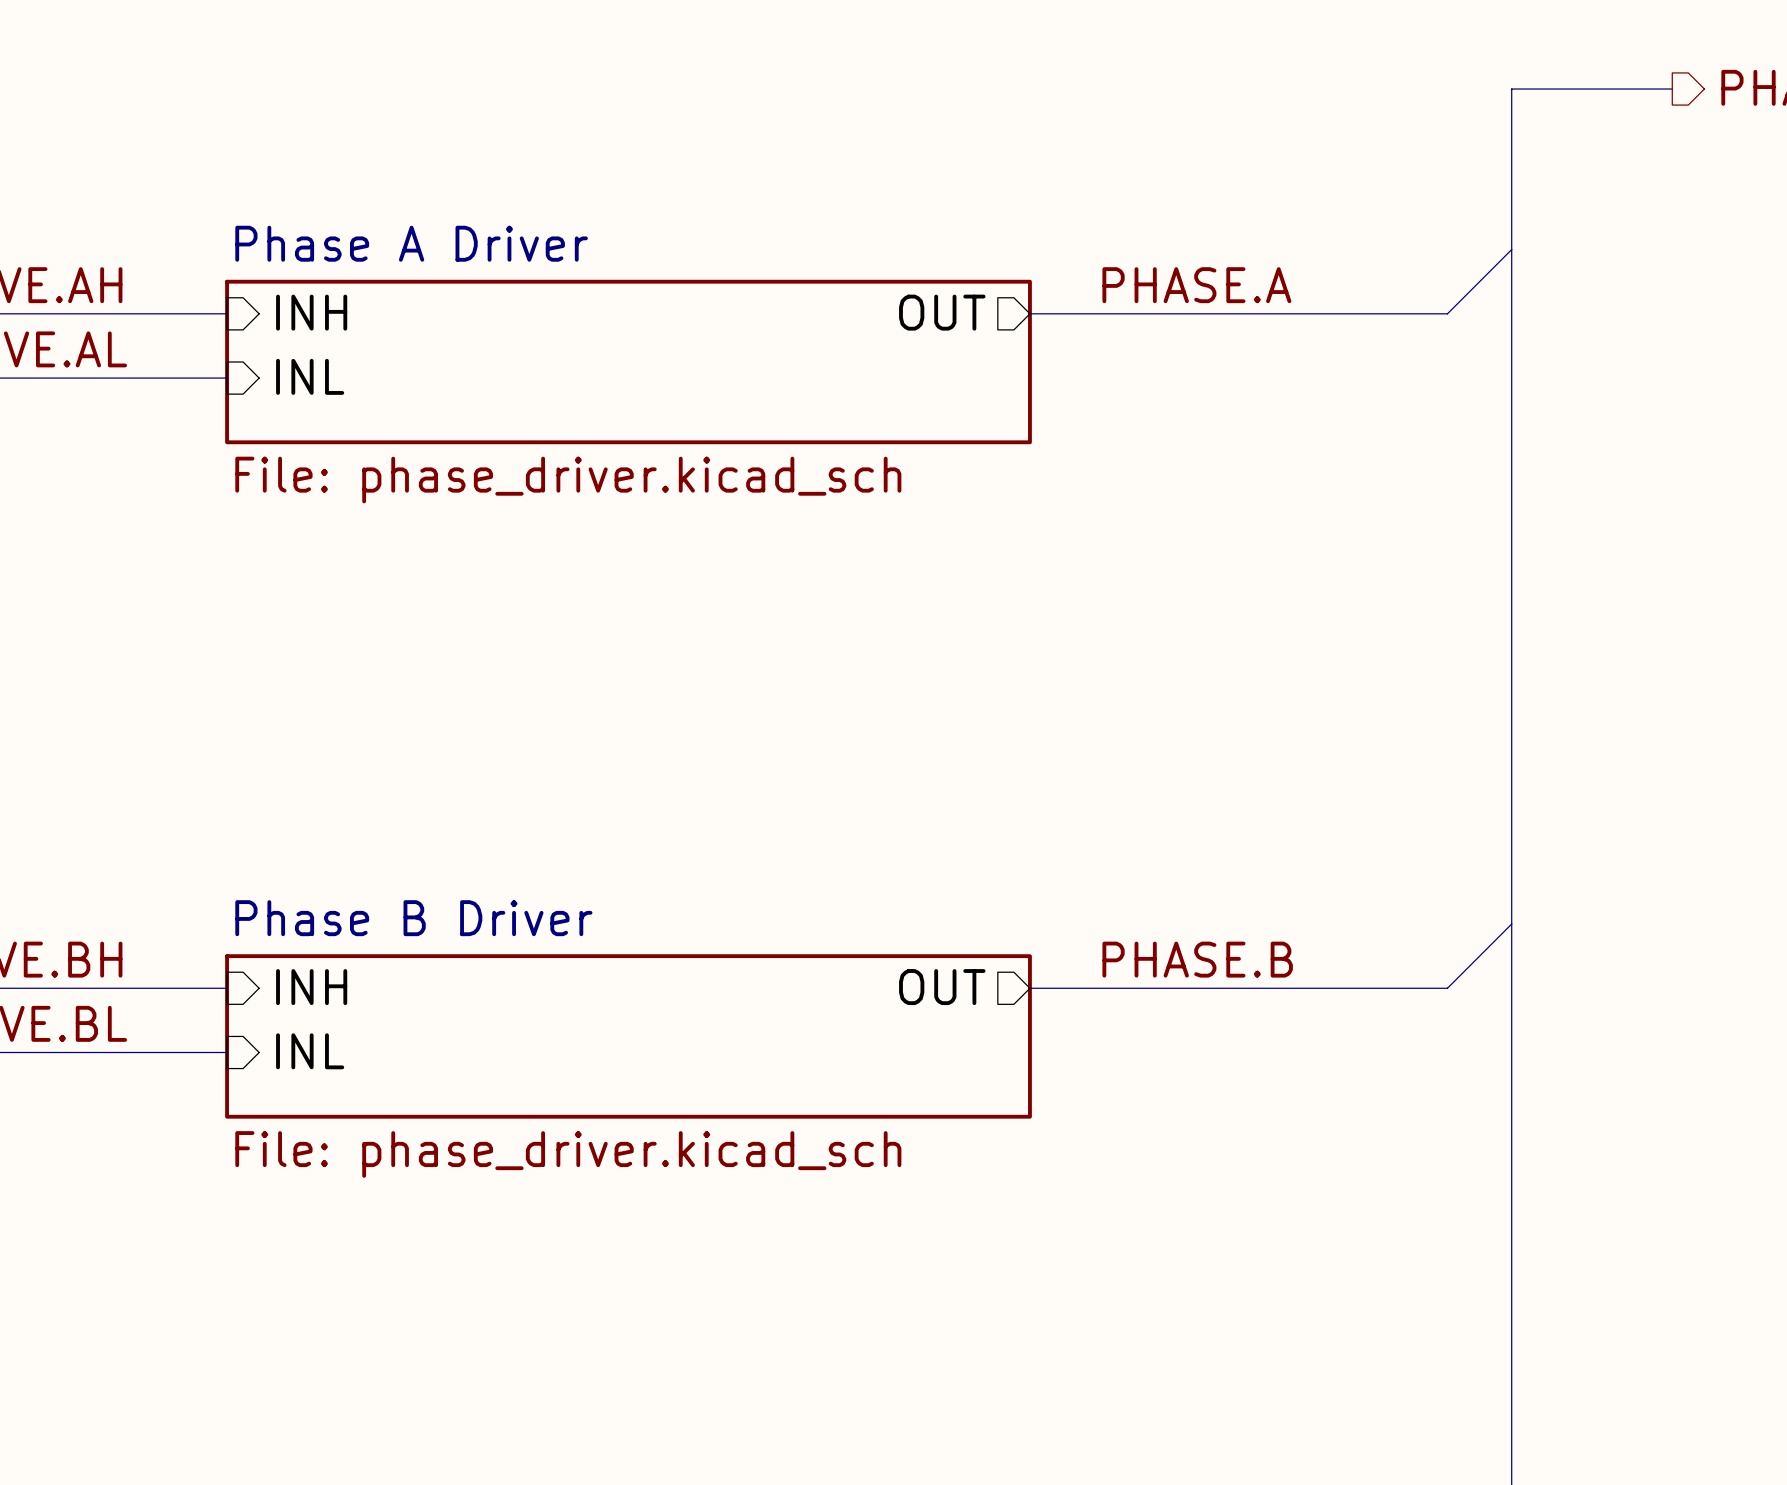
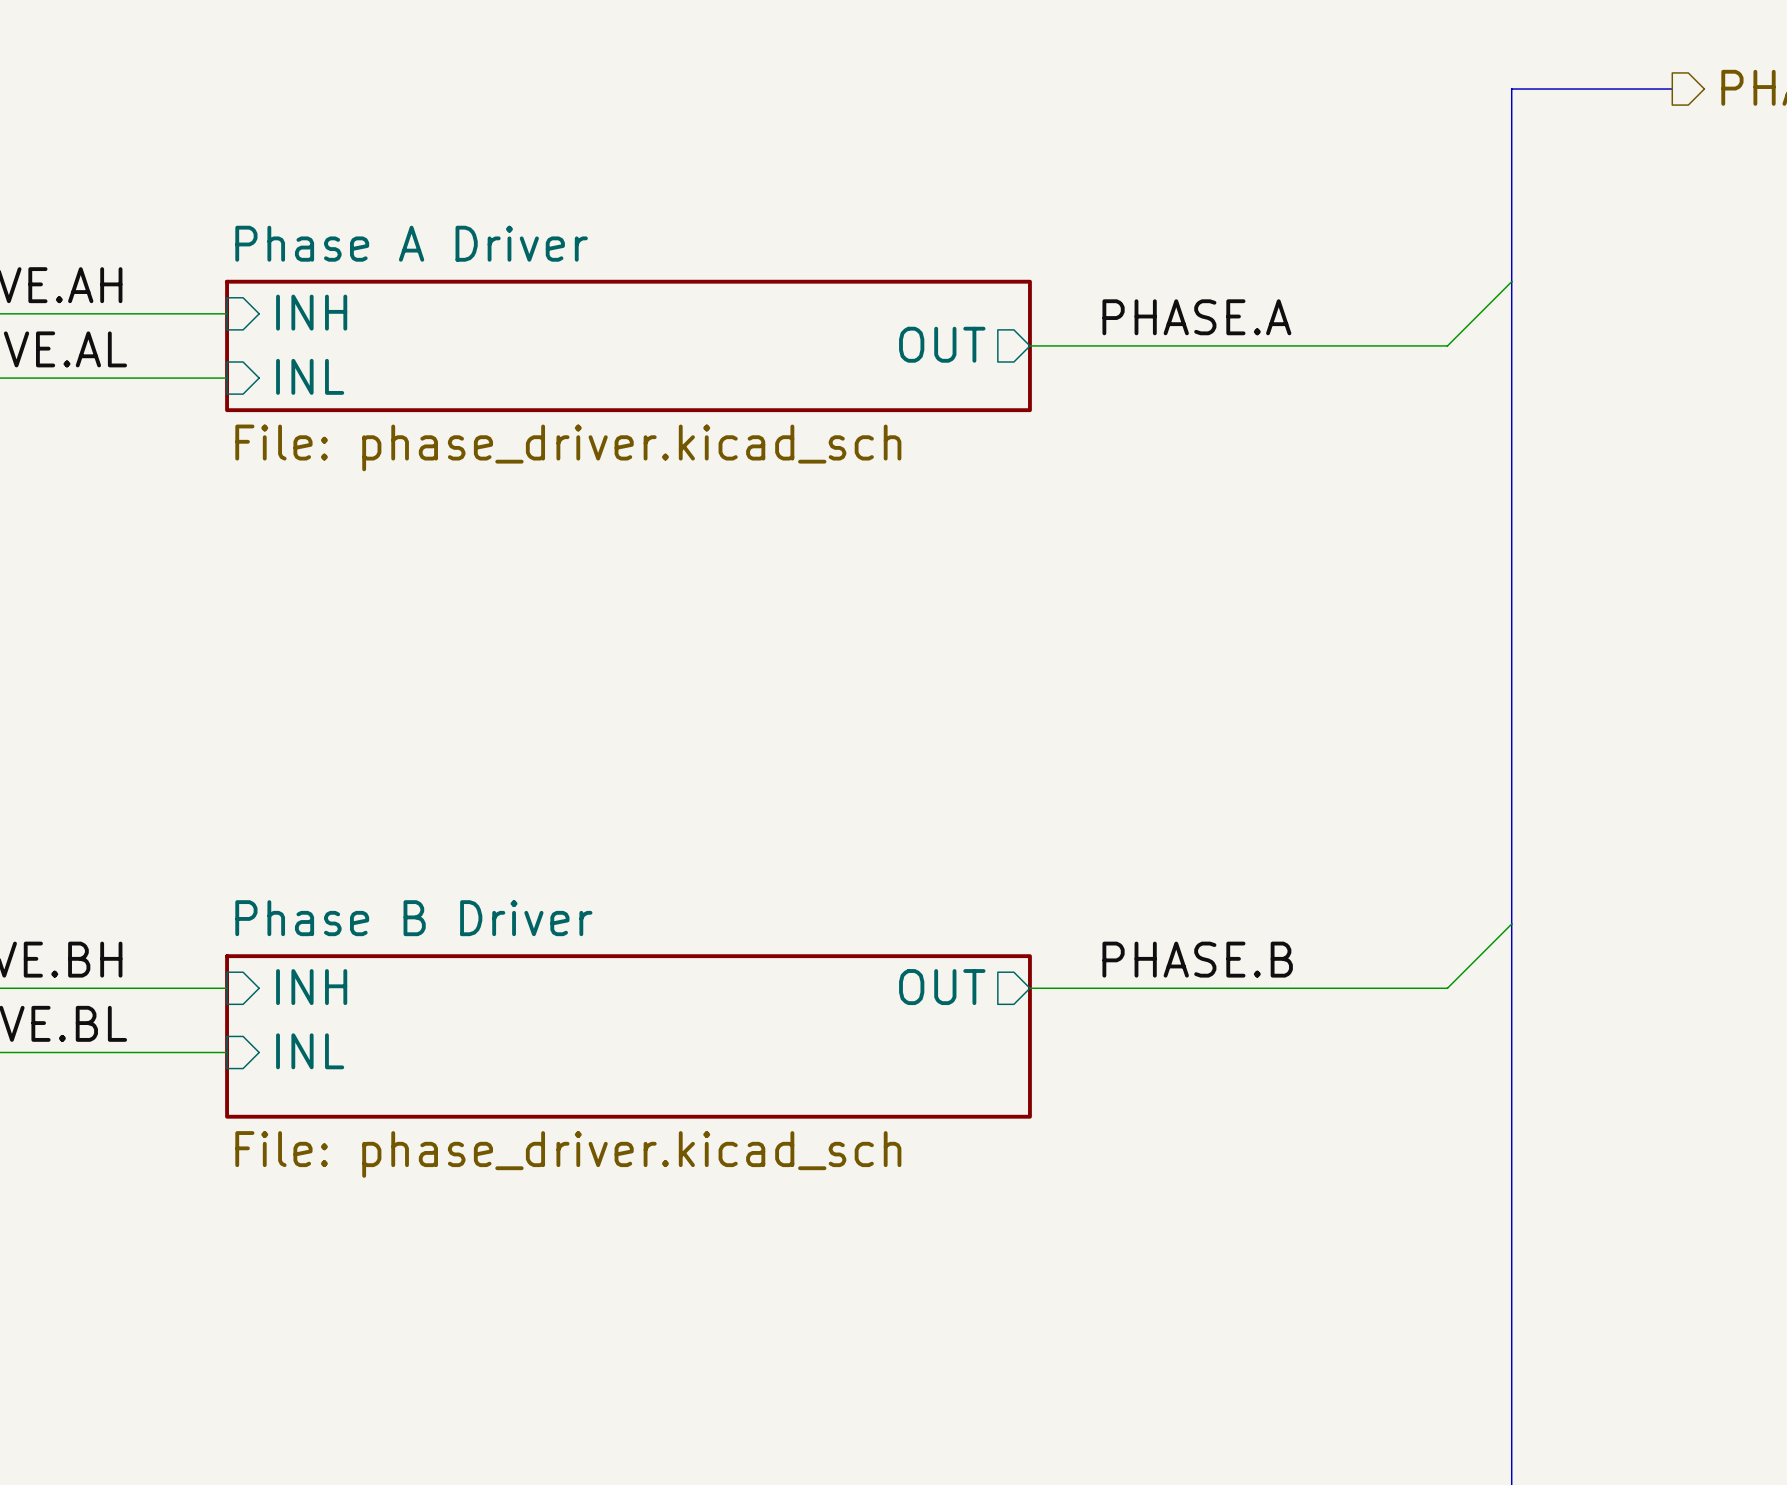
wire: (1511, 249) (1447, 313) (1029, 313) -> (1511, 281) (1447, 345) (1029, 345)
sheet Phase A Driver shape: [225, 279, 1032, 445] -> [225, 279, 1032, 413]
label position: PHASE.A (1196, 285) -> PHASE.A (1196, 317)
sheet pin position: OUT (942, 312) -> OUT (942, 344)

